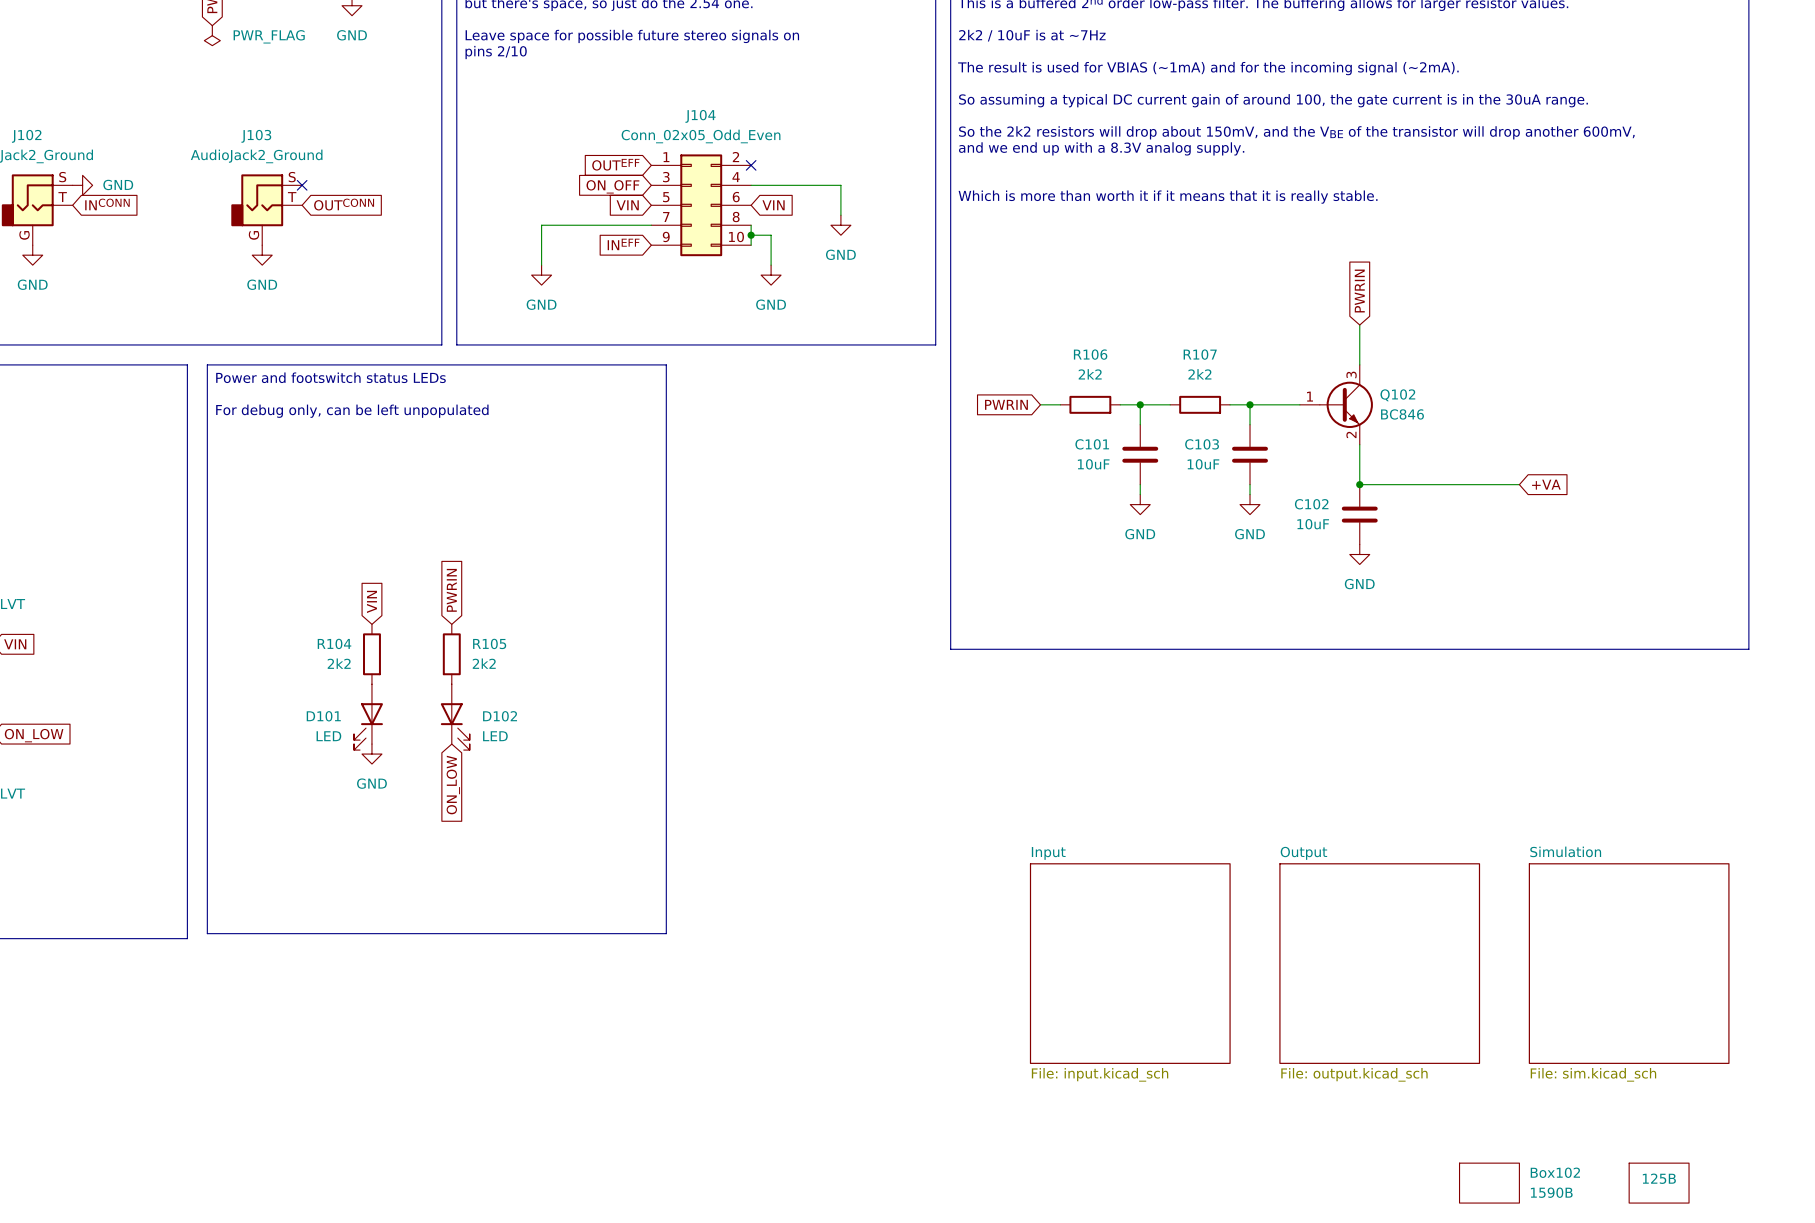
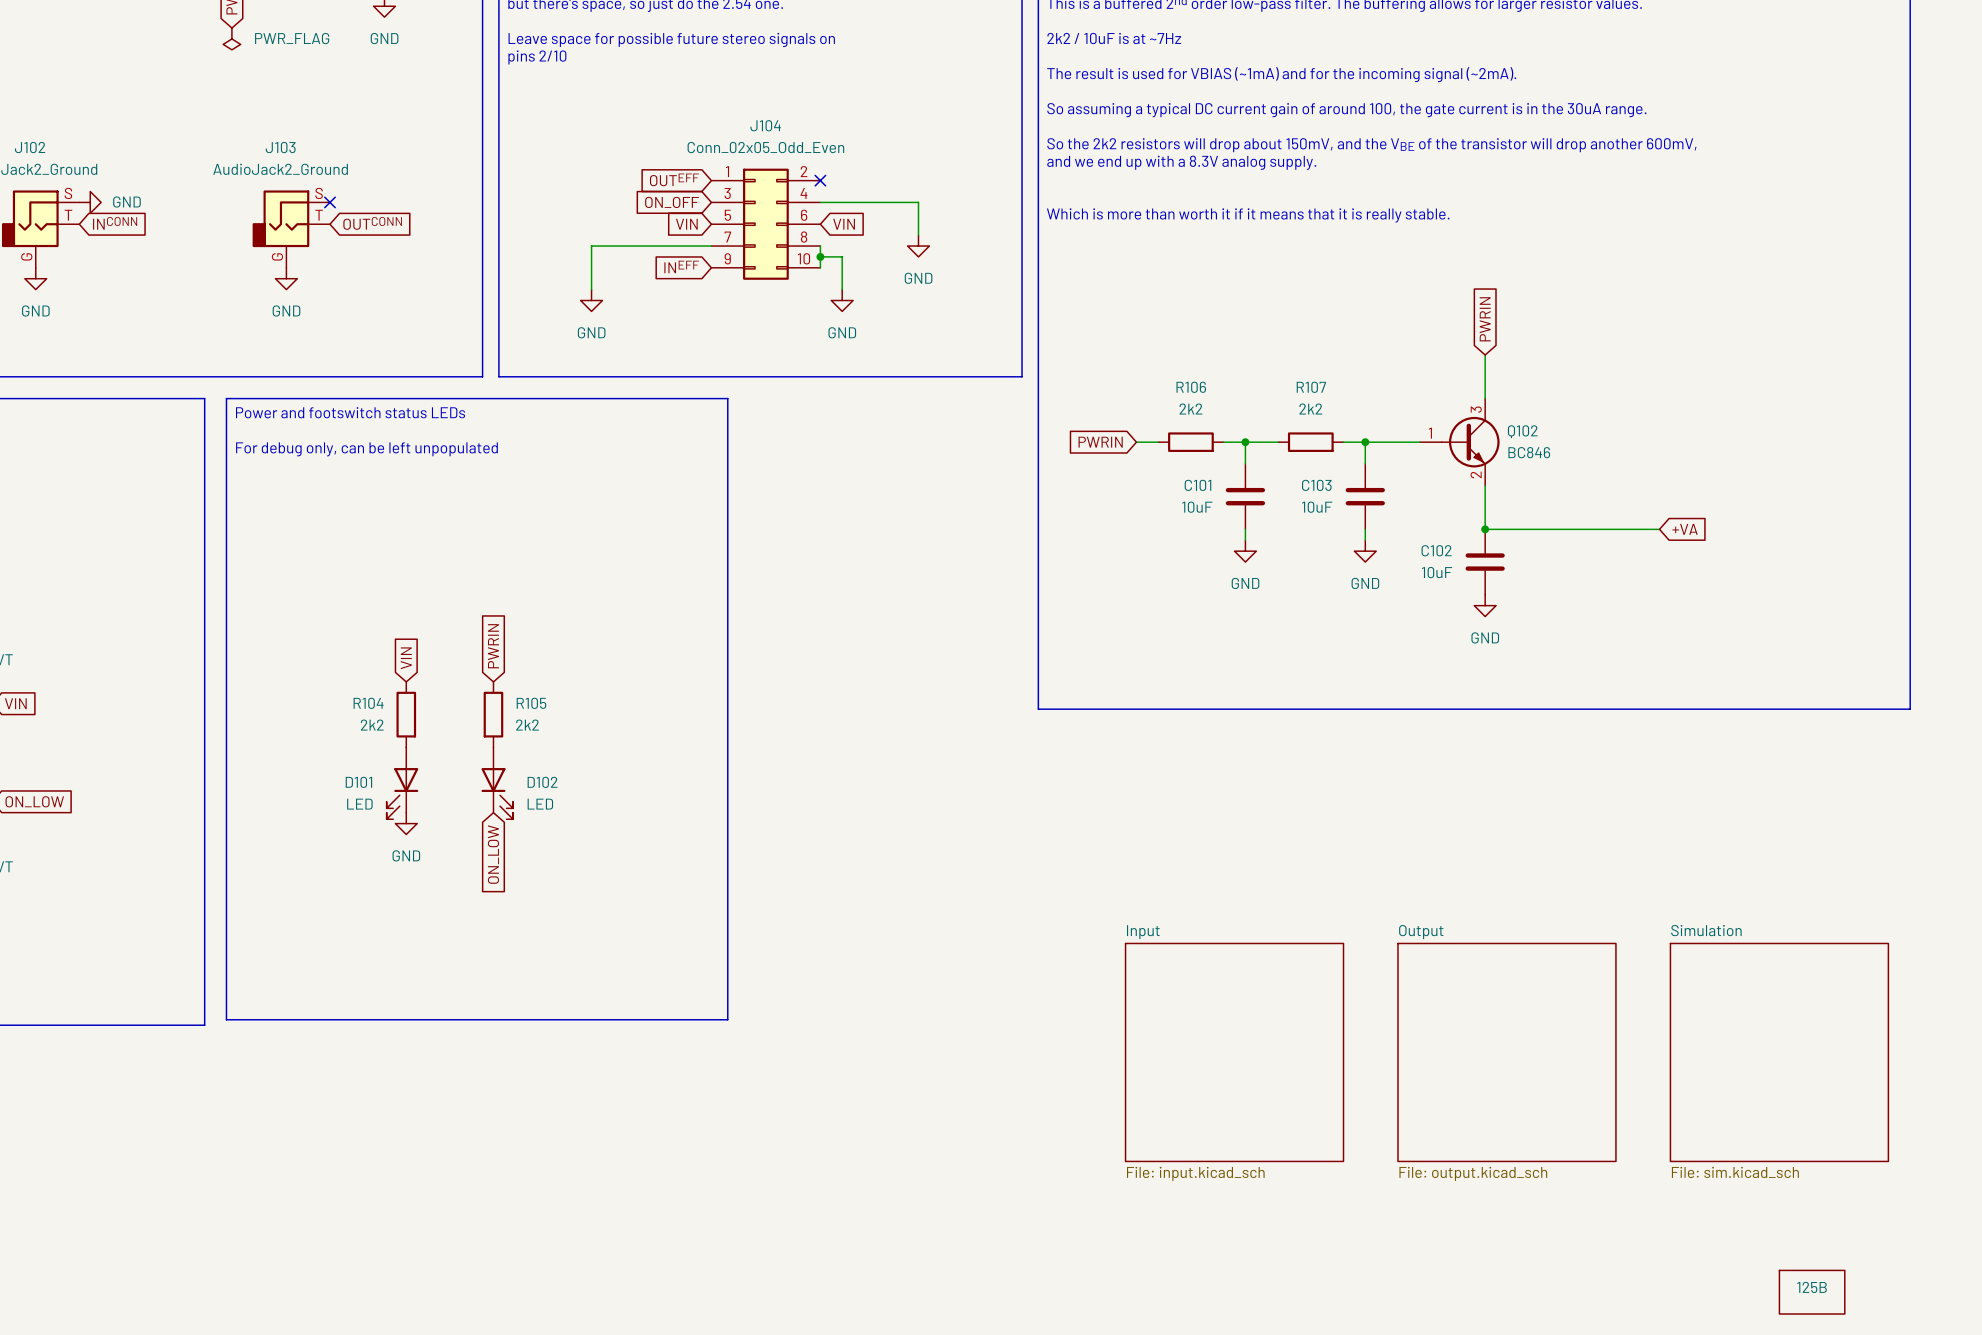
Box102: 1590B (1489, 1183) -> none

